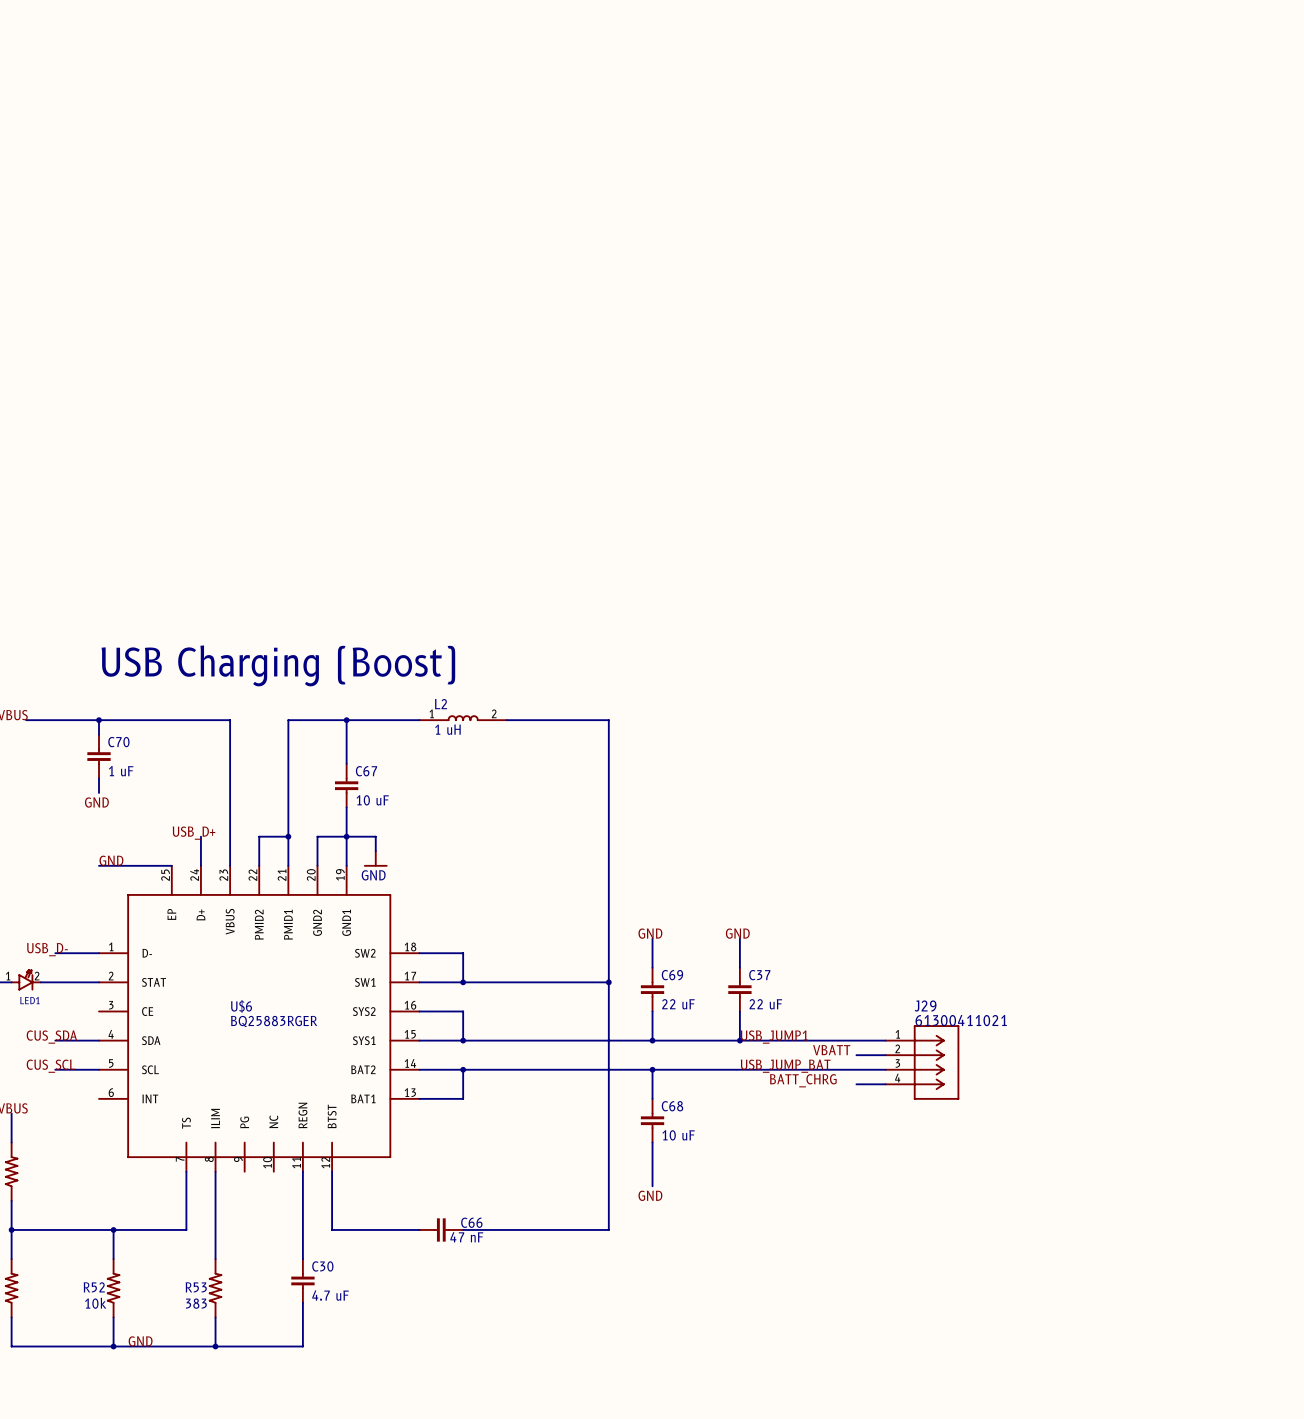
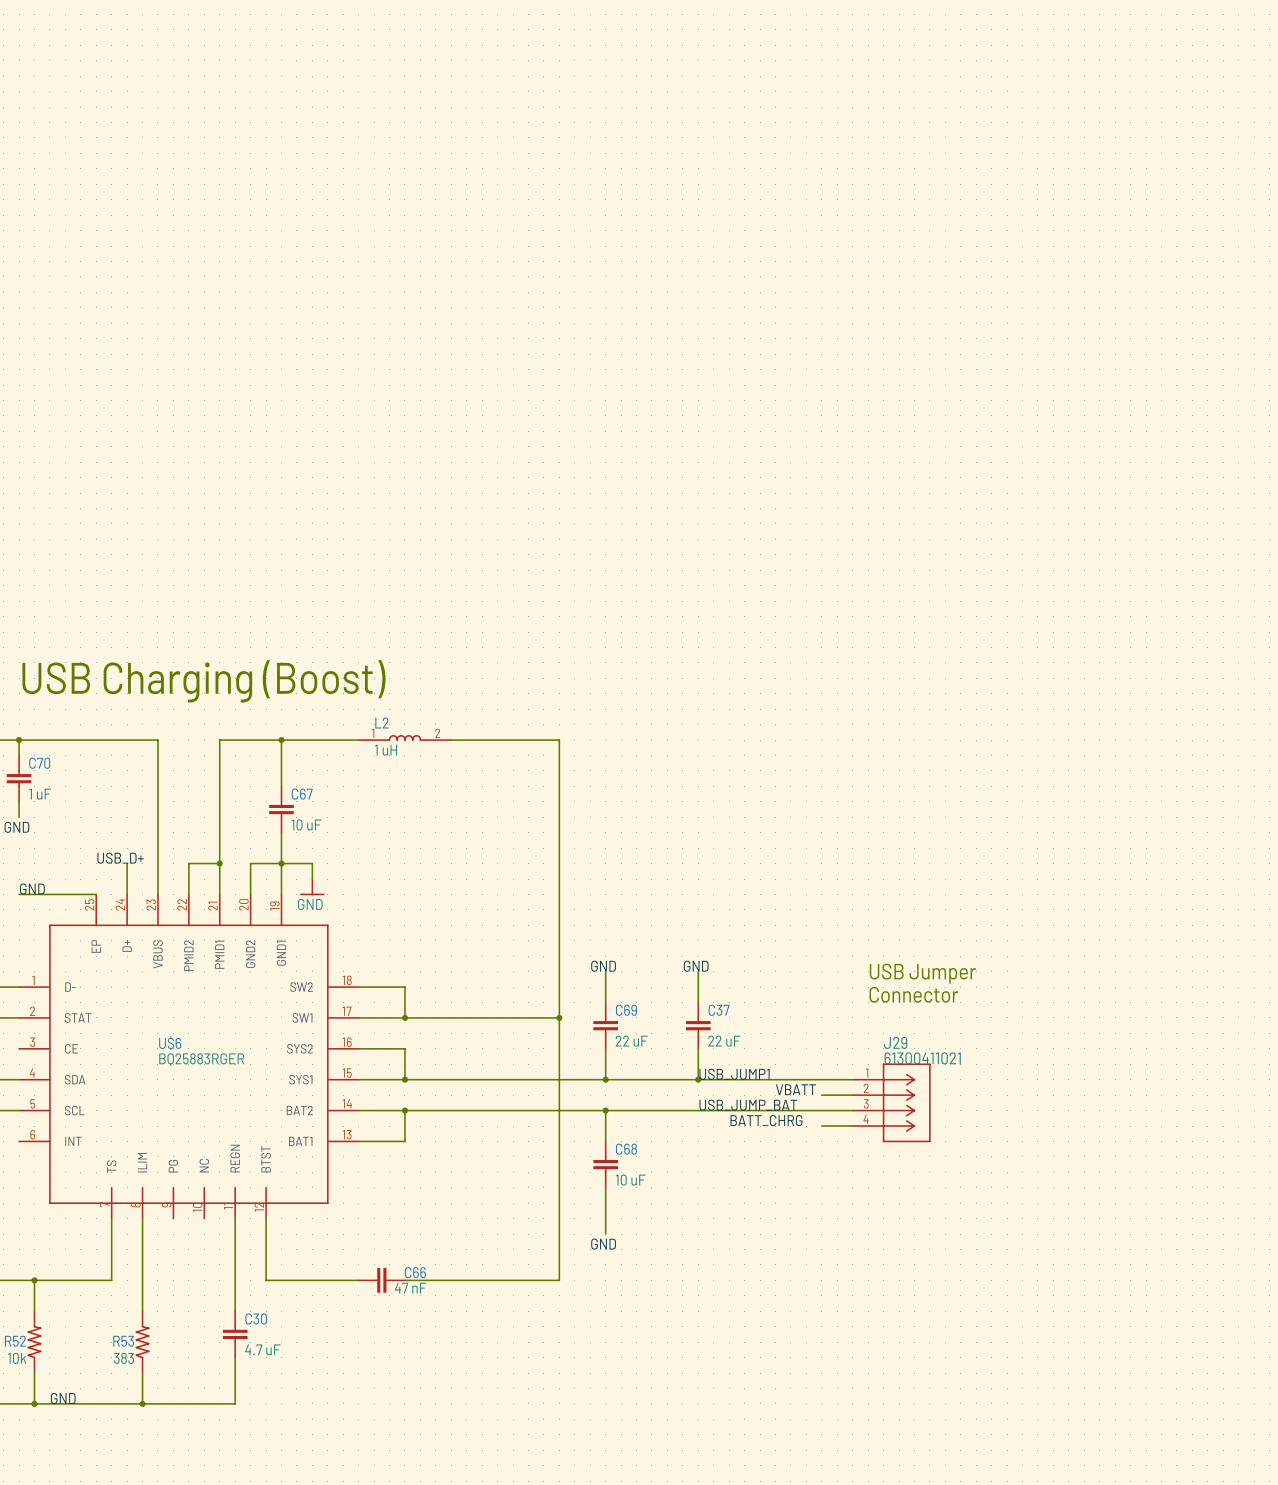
text: none -> USB Jumper (922, 973)
text: none -> Connector (913, 994)

